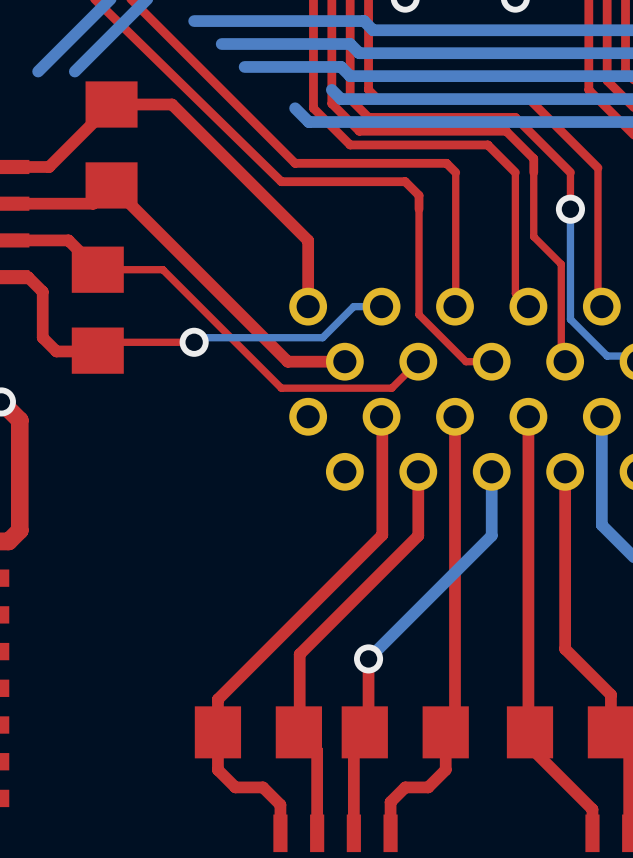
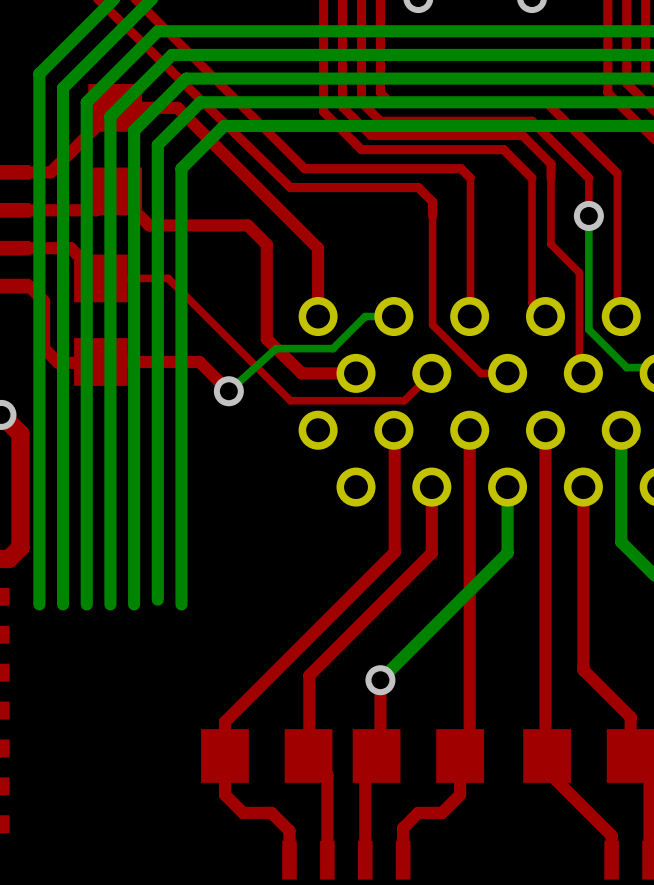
bottom track: (194, 21) (363, 21) (373, 30) -> (86, 604) (86, 102) (157, 31) (385, 31)
bottom track: (221, 44) (350, 44) (359, 53) -> (110, 604) (110, 116) (172, 54) (370, 54)
bottom track: (244, 66) (341, 66) (350, 76) -> (134, 604) (134, 130) (186, 78) (361, 78)
bottom track: none -> (39, 73) (39, 604)
bottom track: none -> (77, 73) (63, 88) (63, 604)
bottom track: (331, 89) (341, 99) -> (157, 599) (157, 144) (200, 102) (352, 102)
bottom track: (295, 108) (308, 122) -> (181, 604) (181, 168) (224, 125) (318, 125)
top track: (144, 218) (287, 361) (292, 361) -> (149, 225) (247, 225) (266, 244) (266, 339) (301, 373)
bottom track: (267, 337) (198, 337) (194, 342) -> (276, 348) (228, 391)
top track: (194, 342) (119, 342) -> none
via position: (194, 342) -> (228, 391)
top track: none -> (100, 361) (199, 361) (228, 391)

